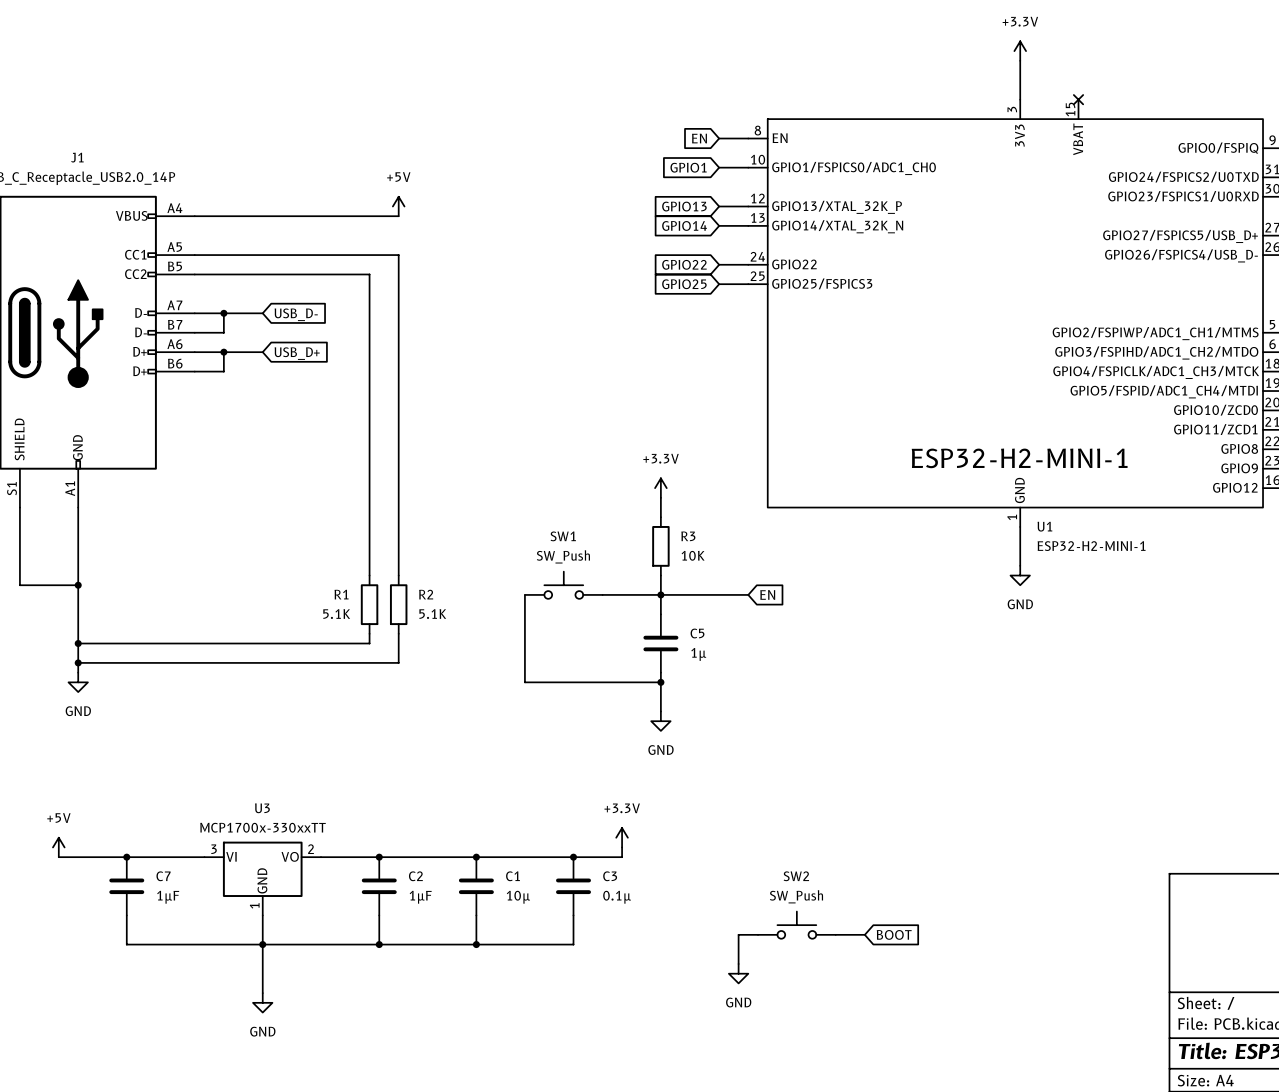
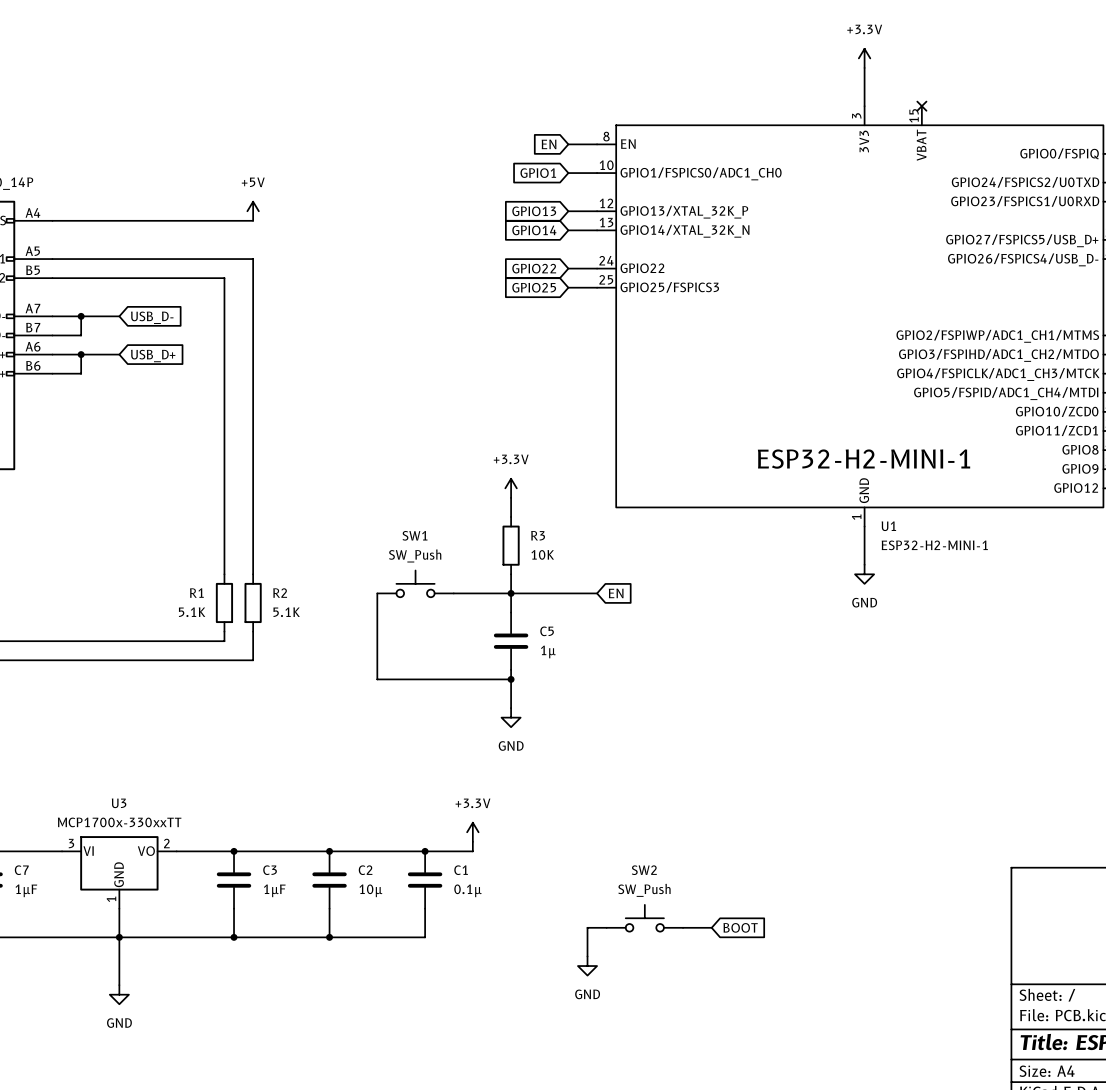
C2 name: C2 (415, 876) -> C3 (270, 870)
C1 name: C1 (512, 876) -> C2 (365, 870)
C3 name: C3 (610, 876) -> C1 (461, 870)

